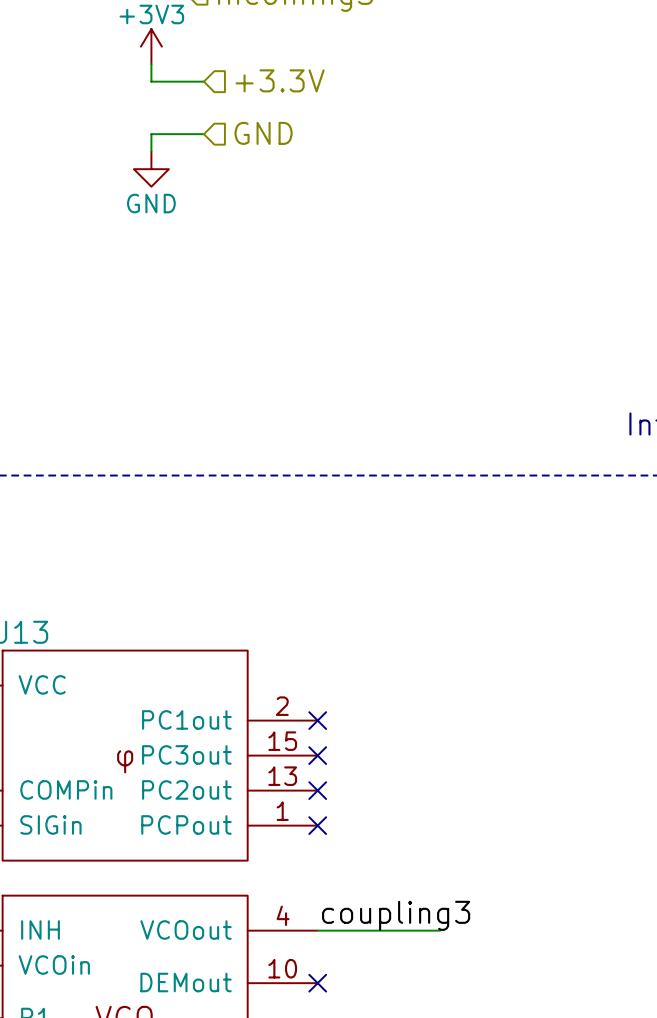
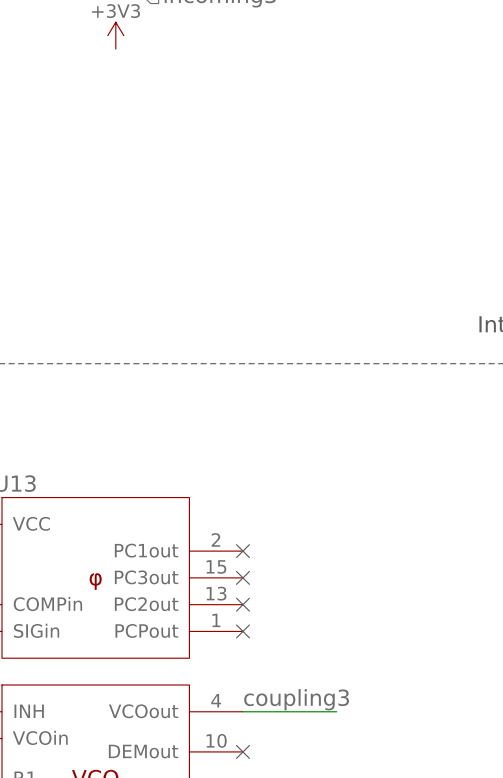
wire: (151, 64) (151, 81) (203, 81) -> none
hierarchical label: +3.3V (280, 80) -> none
hierarchical label: GND (263, 133) -> none
wire: (203, 134) (151, 134) (151, 151) -> none
power symbol: GND (151, 169) -> none

